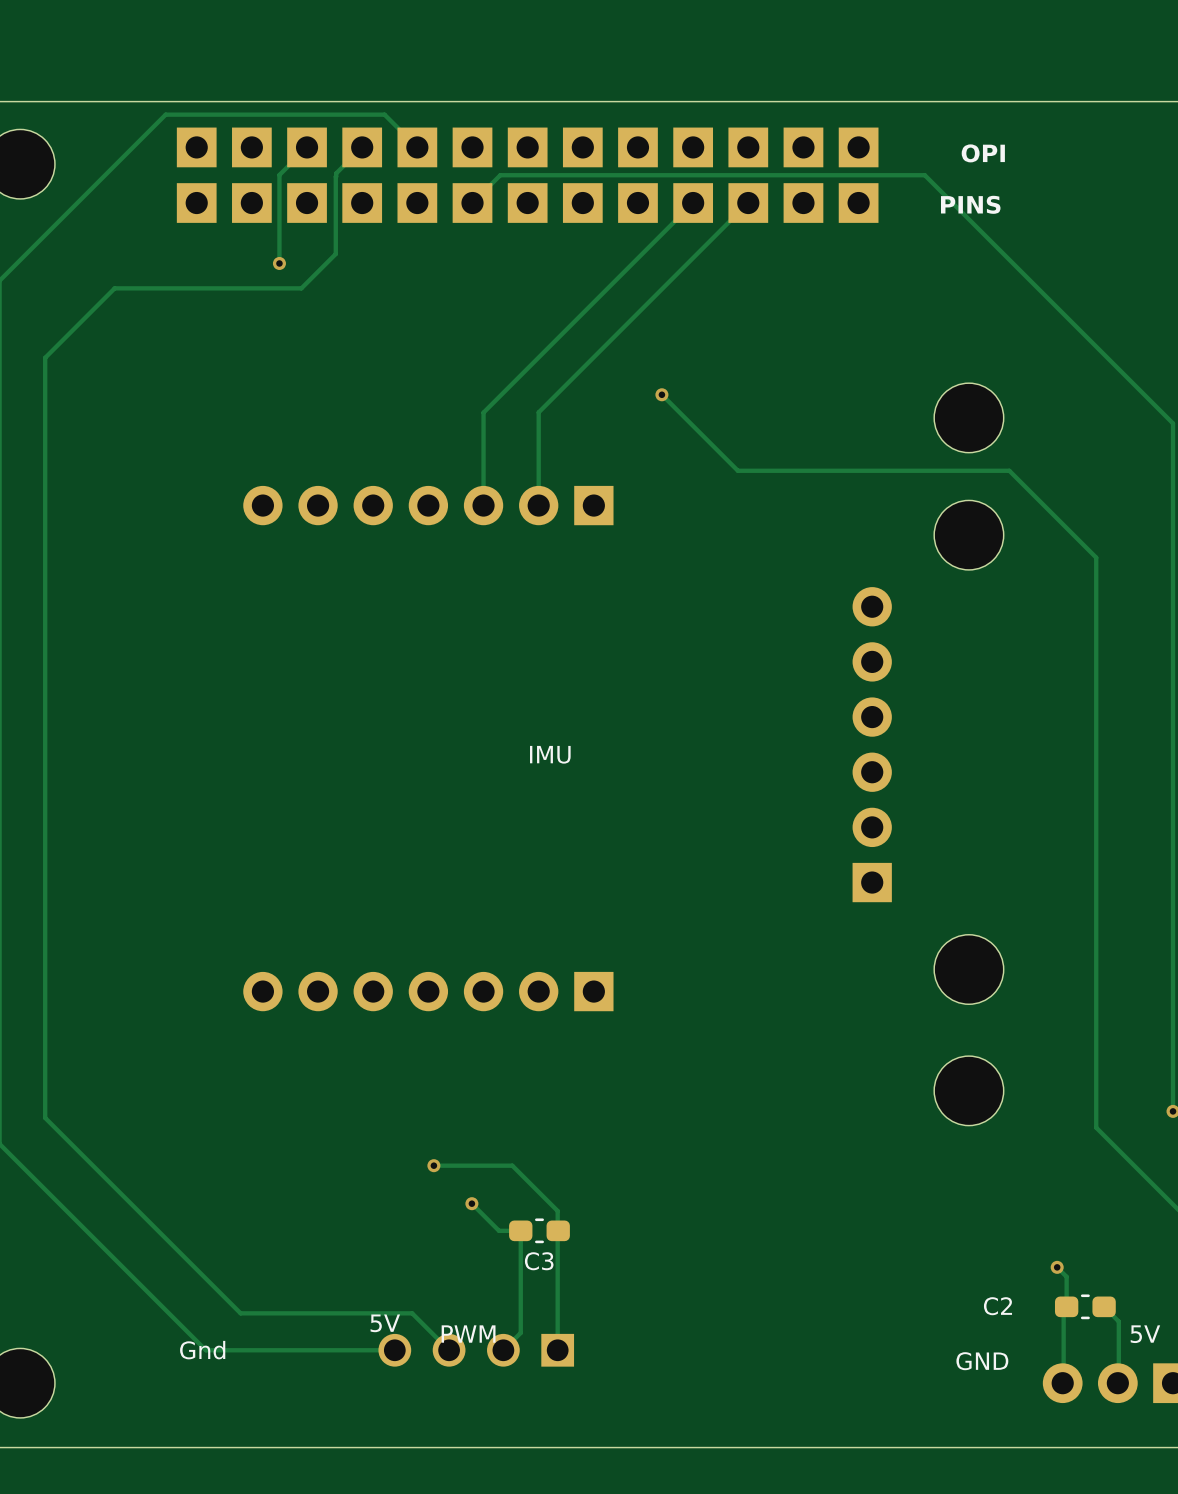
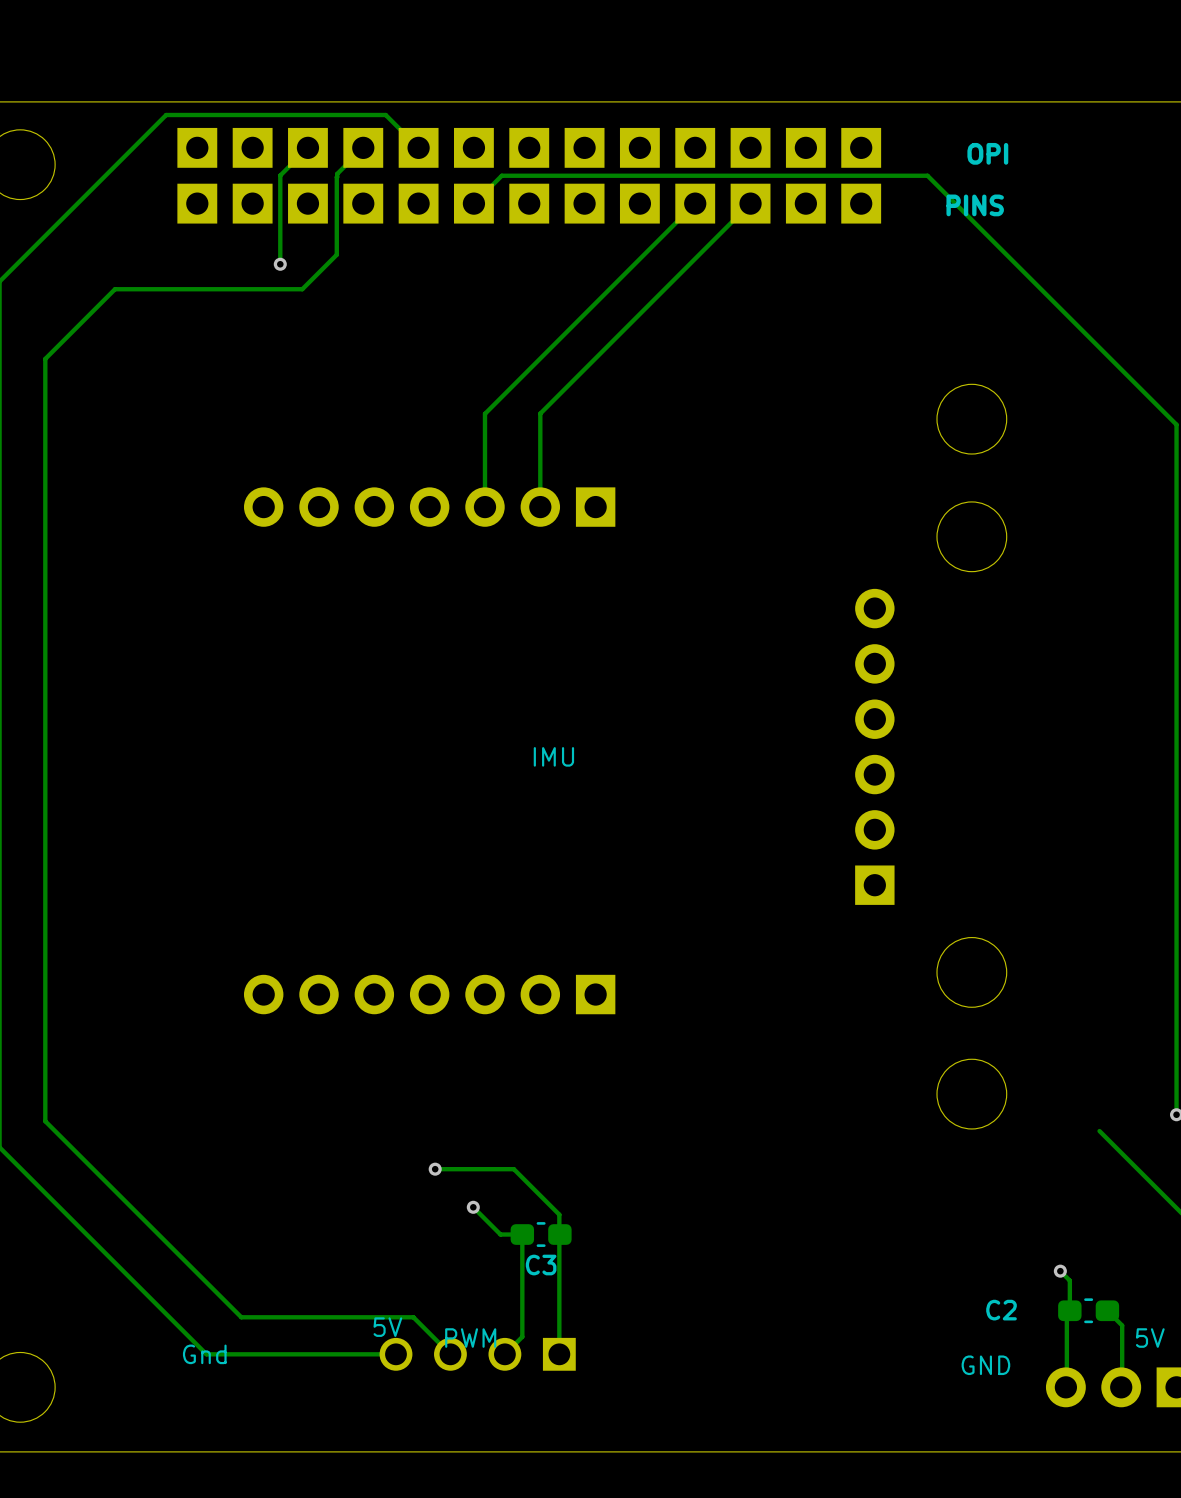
track: (661, 394) (737, 470) (1009, 470) (1096, 557) (1096, 1127) -> none
via: (661, 394) -> none

